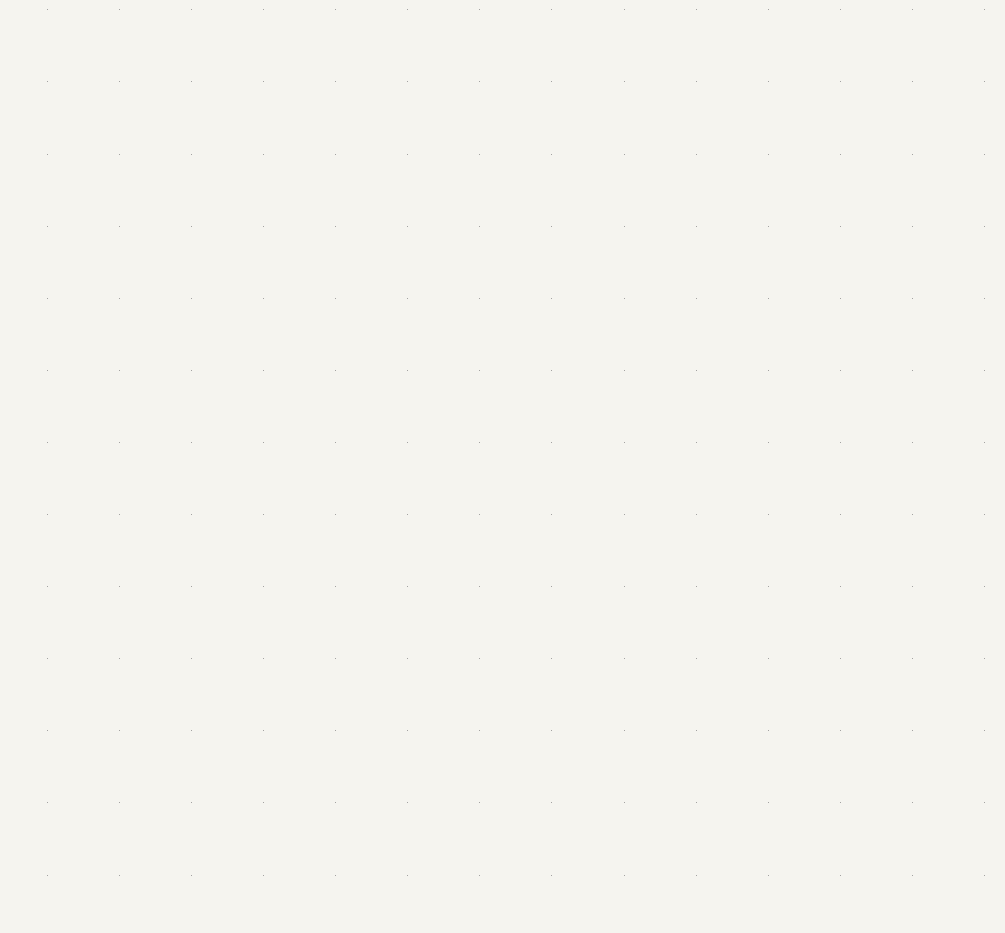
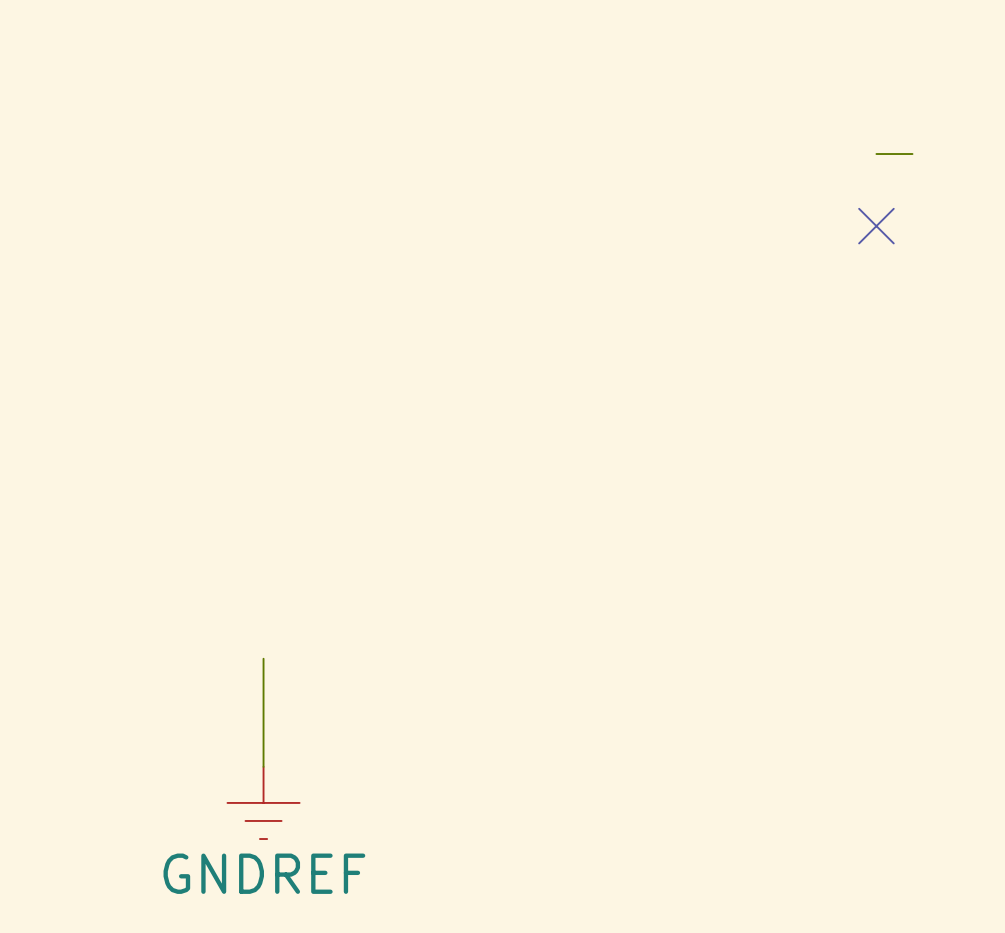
wire: none -> (876, 154) (912, 154)
no-connect mark: none -> (876, 226)
wire: none -> (263, 658) (263, 766)
power symbol: none -> GNDREF (263, 802)

